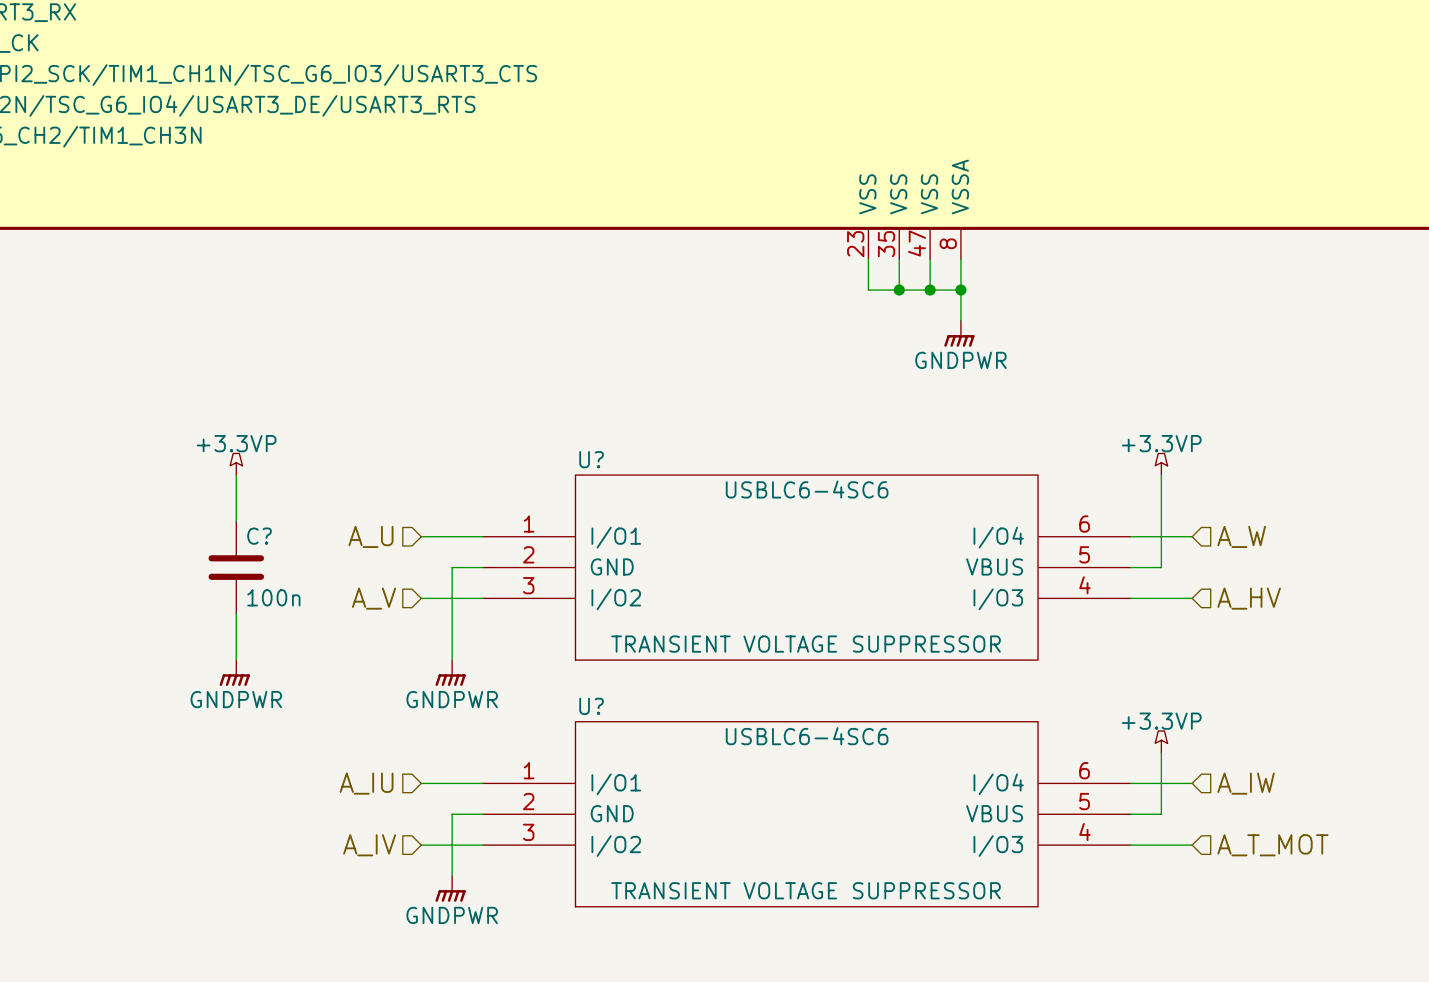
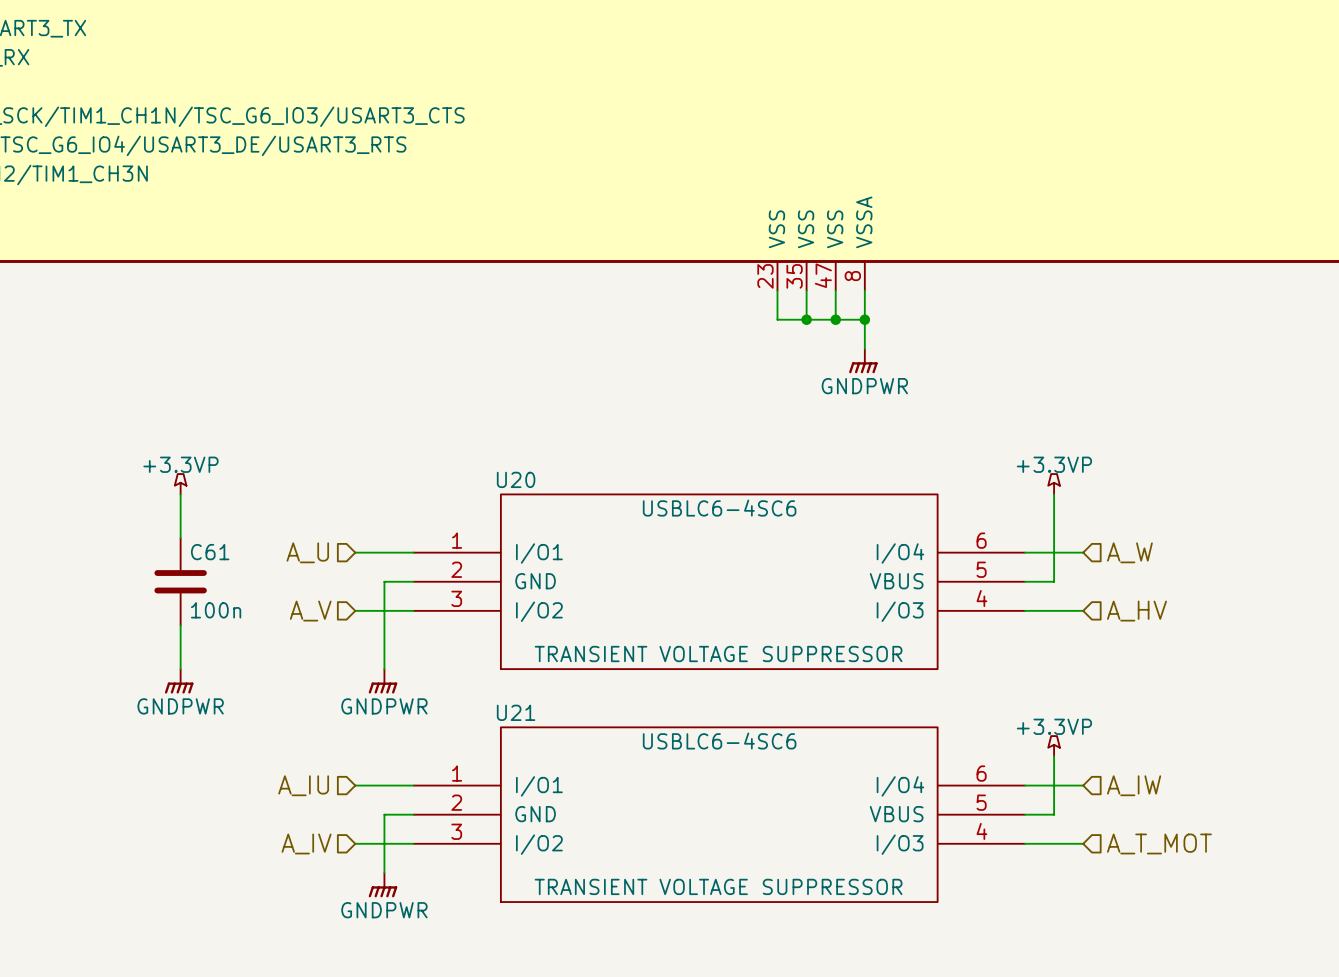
U? name: U? (591, 459) -> U20 (516, 479)
C? name: C? (259, 536) -> C61 (210, 552)
U? name: U? (591, 706) -> U21 (516, 712)

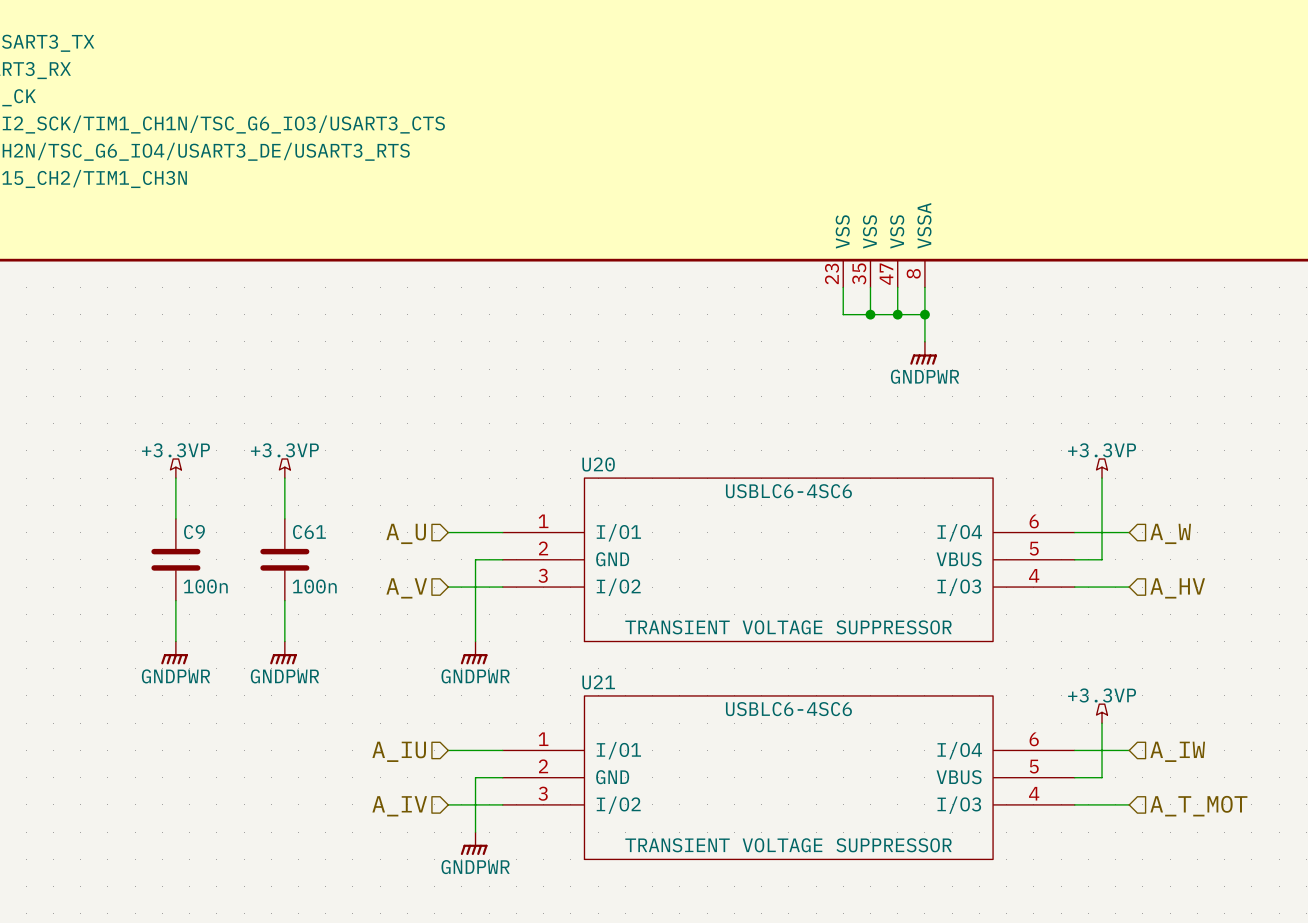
power symbol: none -> +3.3VP (175, 468)
wire: none -> (175, 478) (175, 518)
C9: none -> 100n (175, 559)
wire: none -> (175, 600) (175, 641)
power symbol: none -> GNDPWR (174, 652)

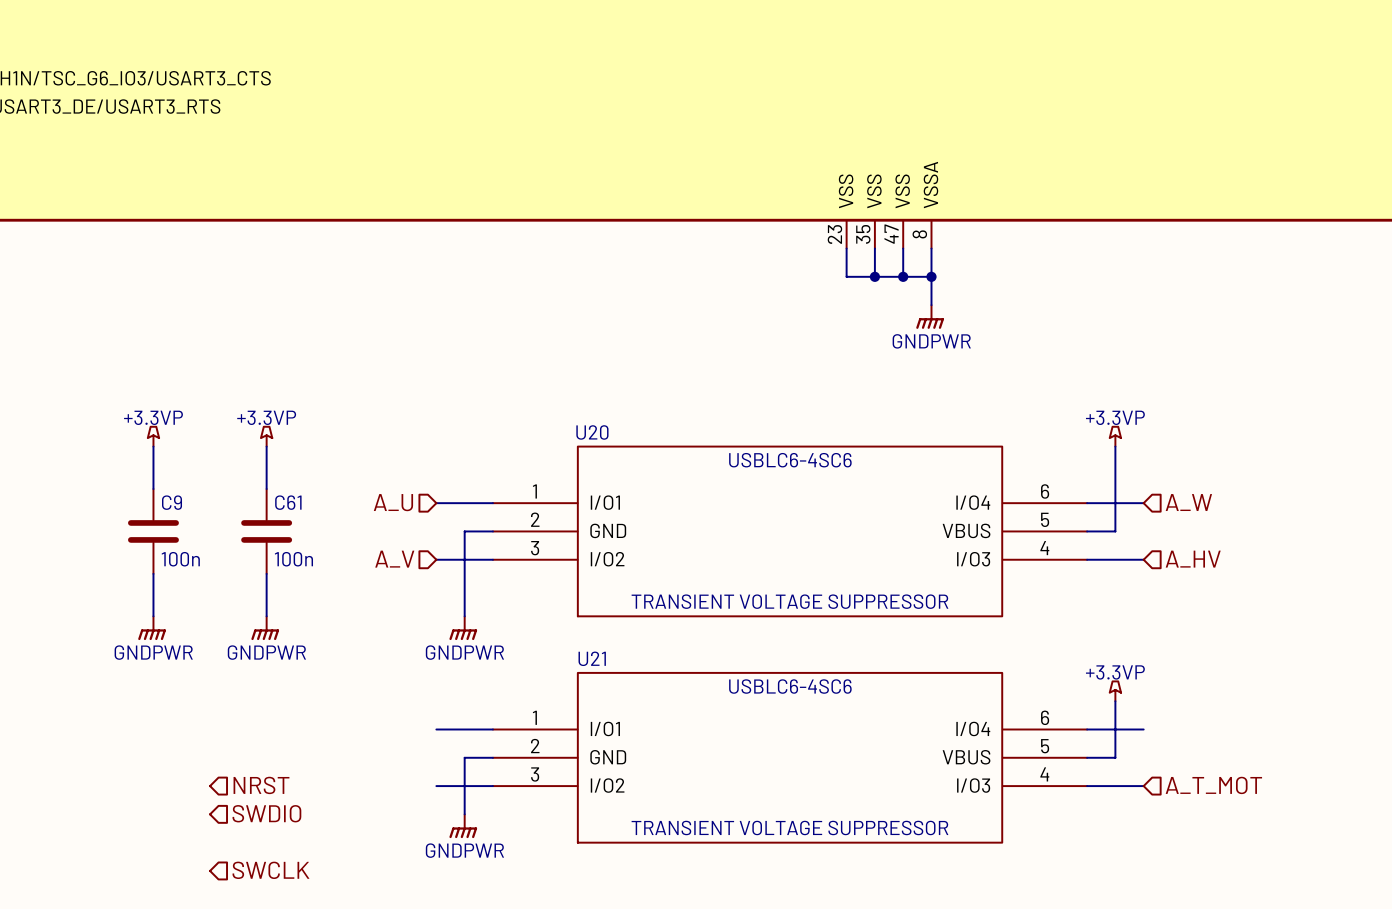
hierarchical label: A_IU (399, 751) -> none
hierarchical label: A_IW (1177, 751) -> none
hierarchical label: none -> NRST (261, 785)
hierarchical label: A_IV (399, 806) -> none
hierarchical label: none -> SWDIO (266, 813)
hierarchical label: none -> SWCLK (270, 870)

